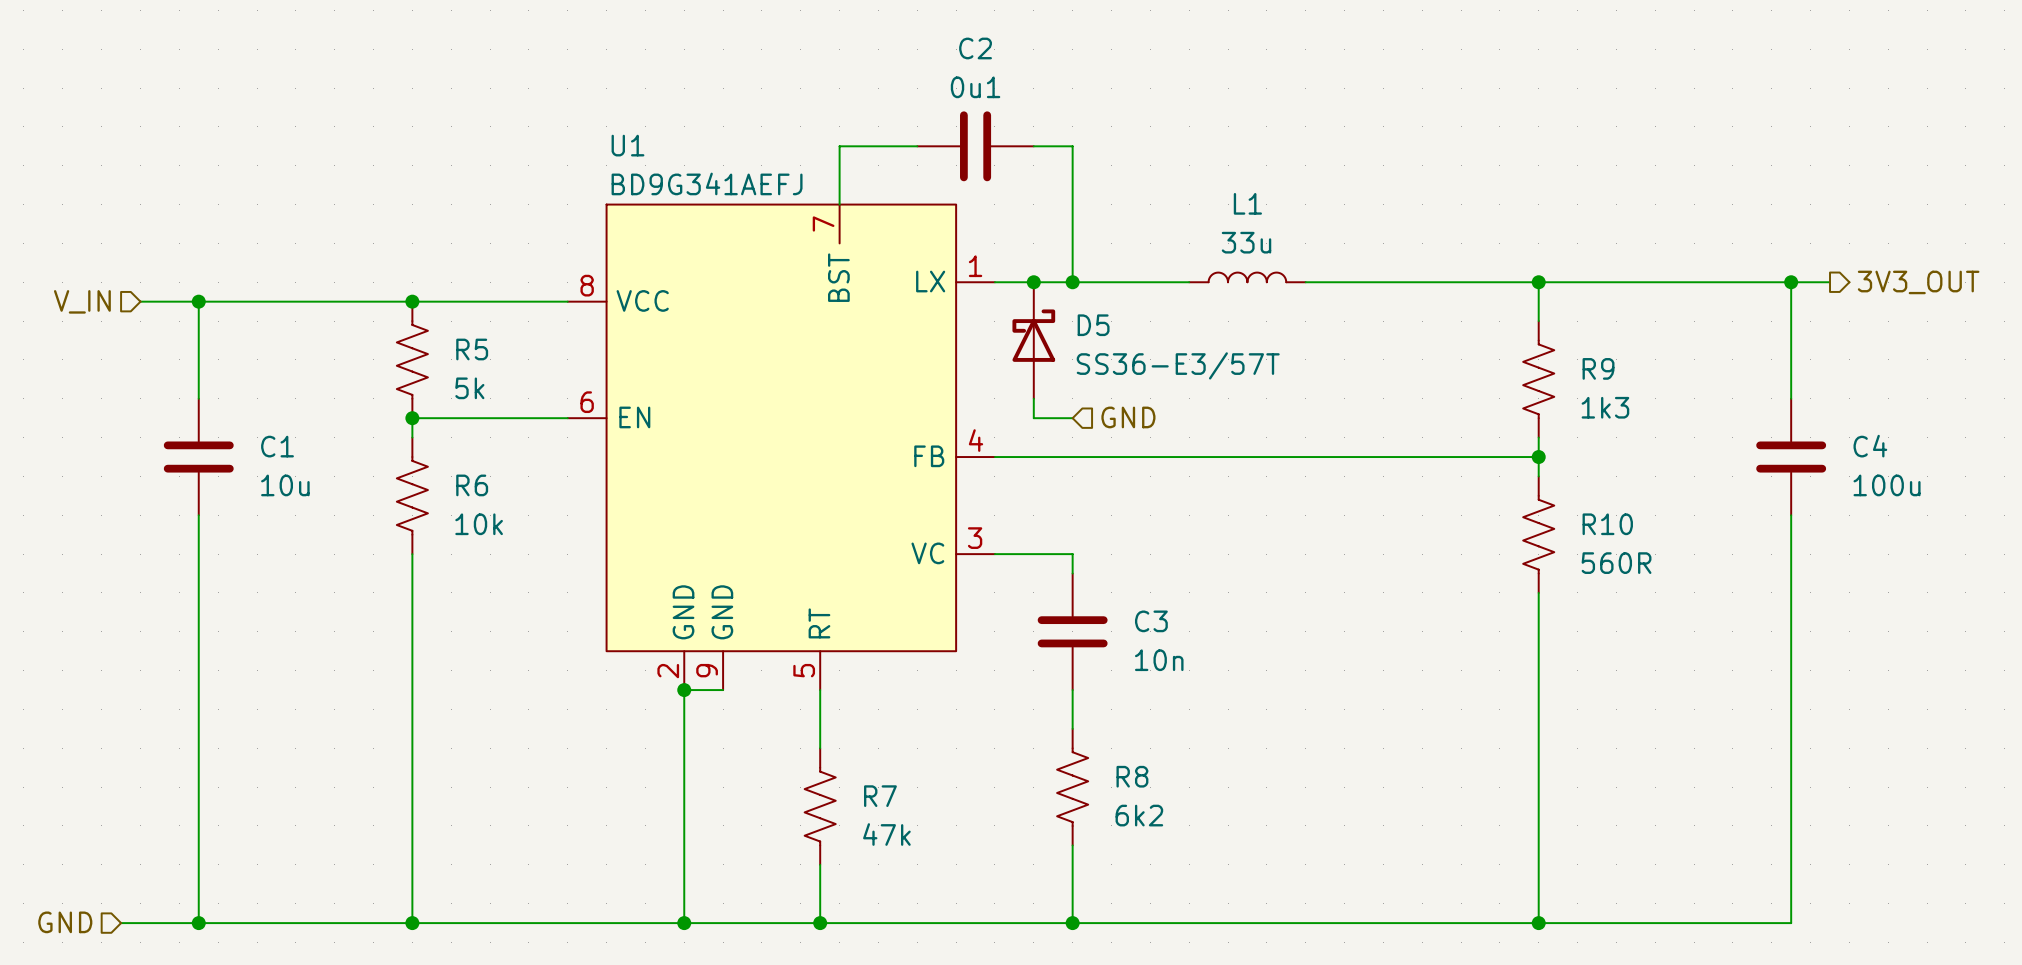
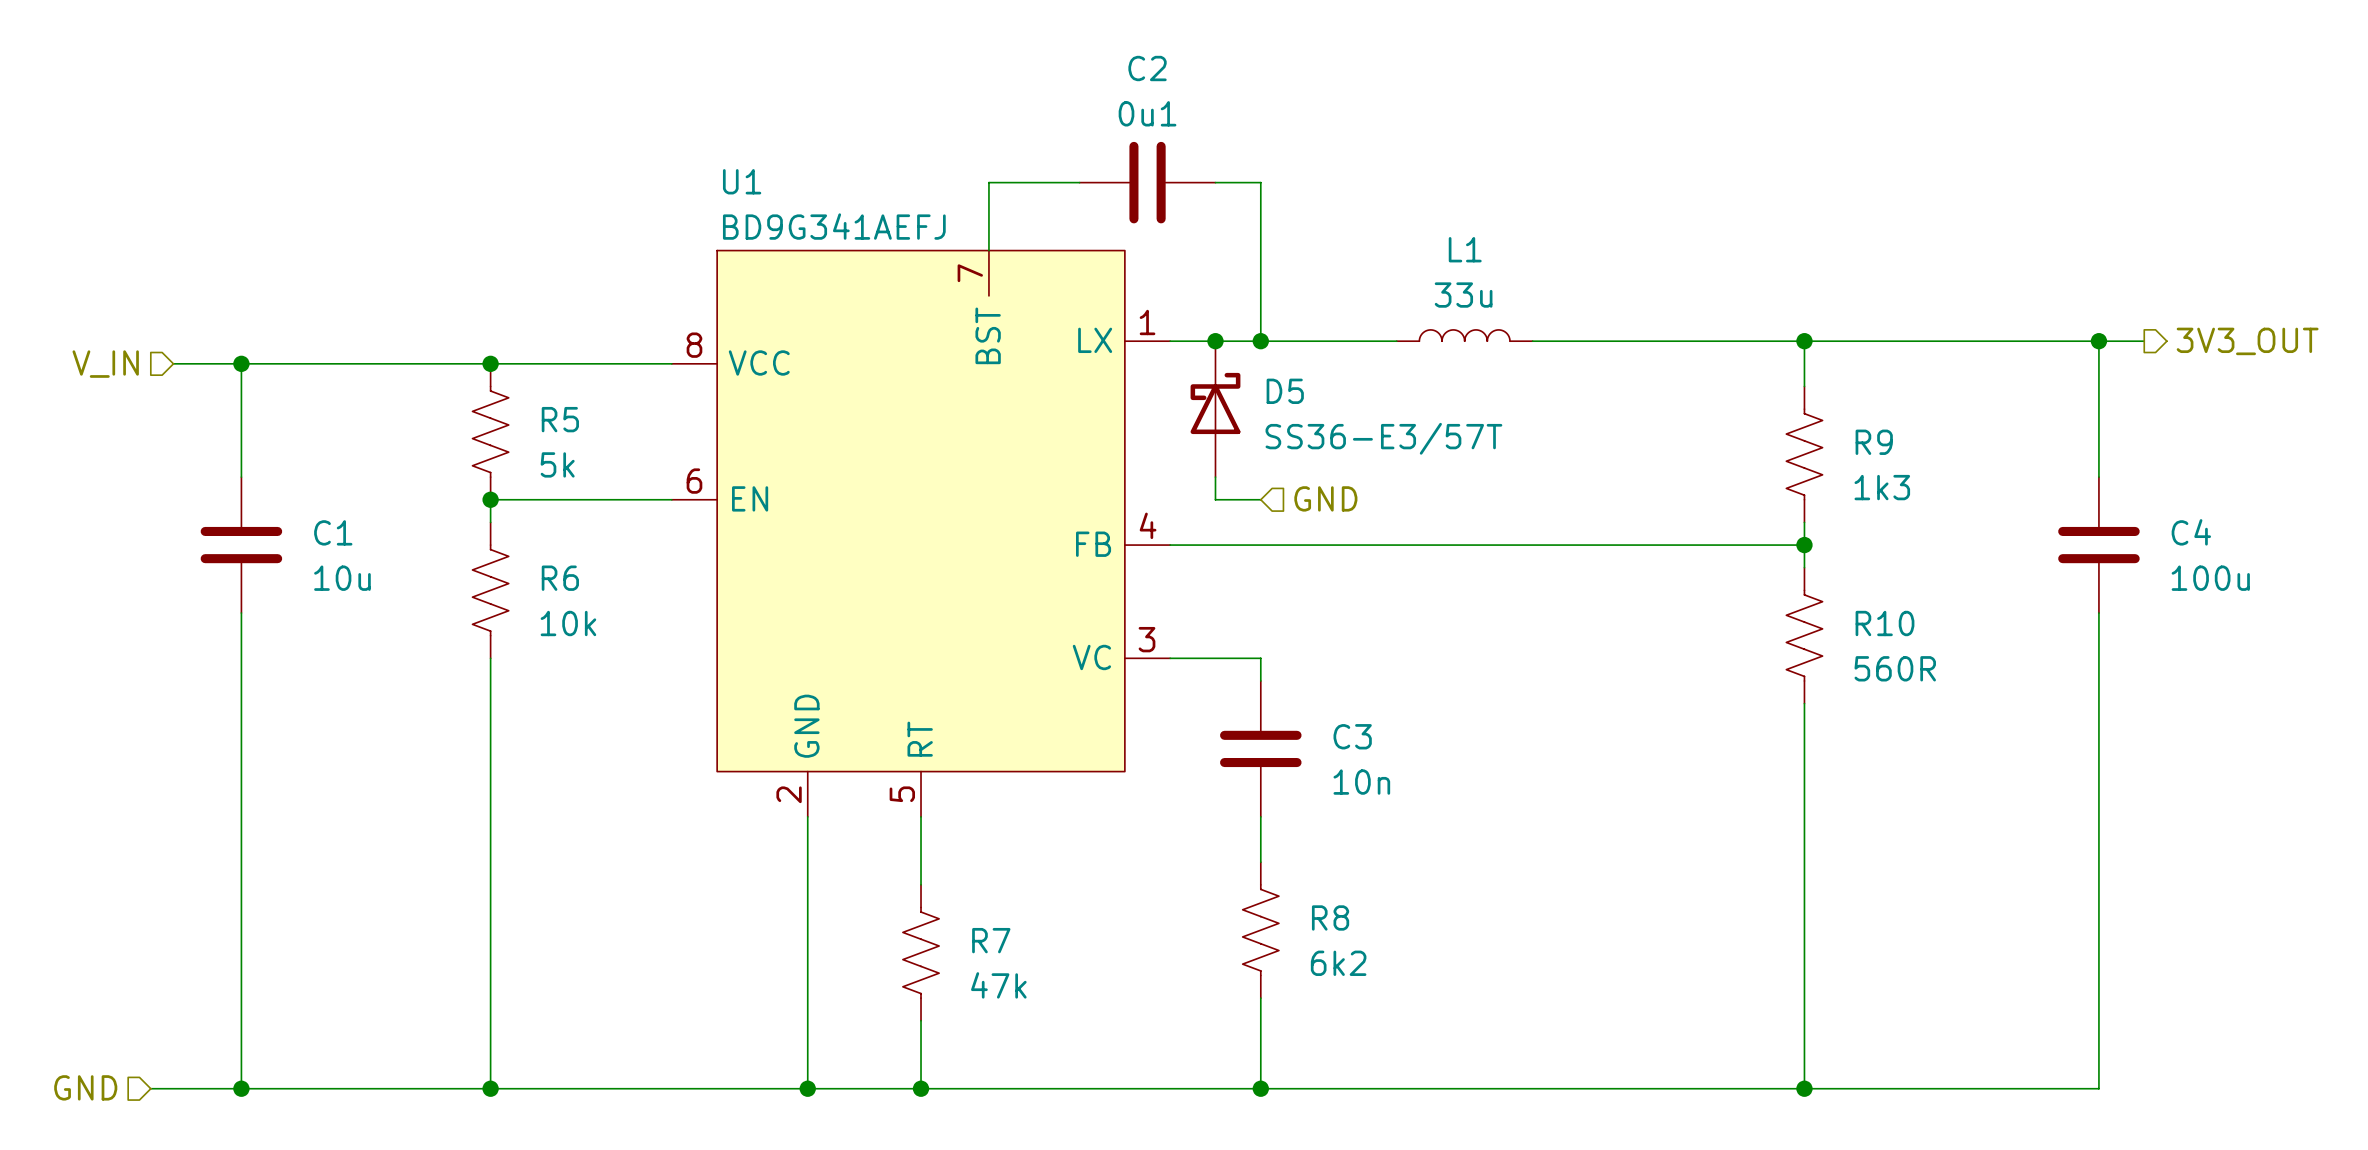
U1 symbol: [567, 204, 995, 691] -> [671, 250, 1171, 817]
wire: (684, 690) (723, 690) -> none
junction: (684, 690) -> none
wire: (820, 690) (820, 748) -> (921, 816) (921, 884)
R7 position: (820, 806) -> (921, 952)
wire: (820, 864) (820, 923) -> (921, 1020) (921, 1088)
junction position: (820, 923) -> (921, 1088)

